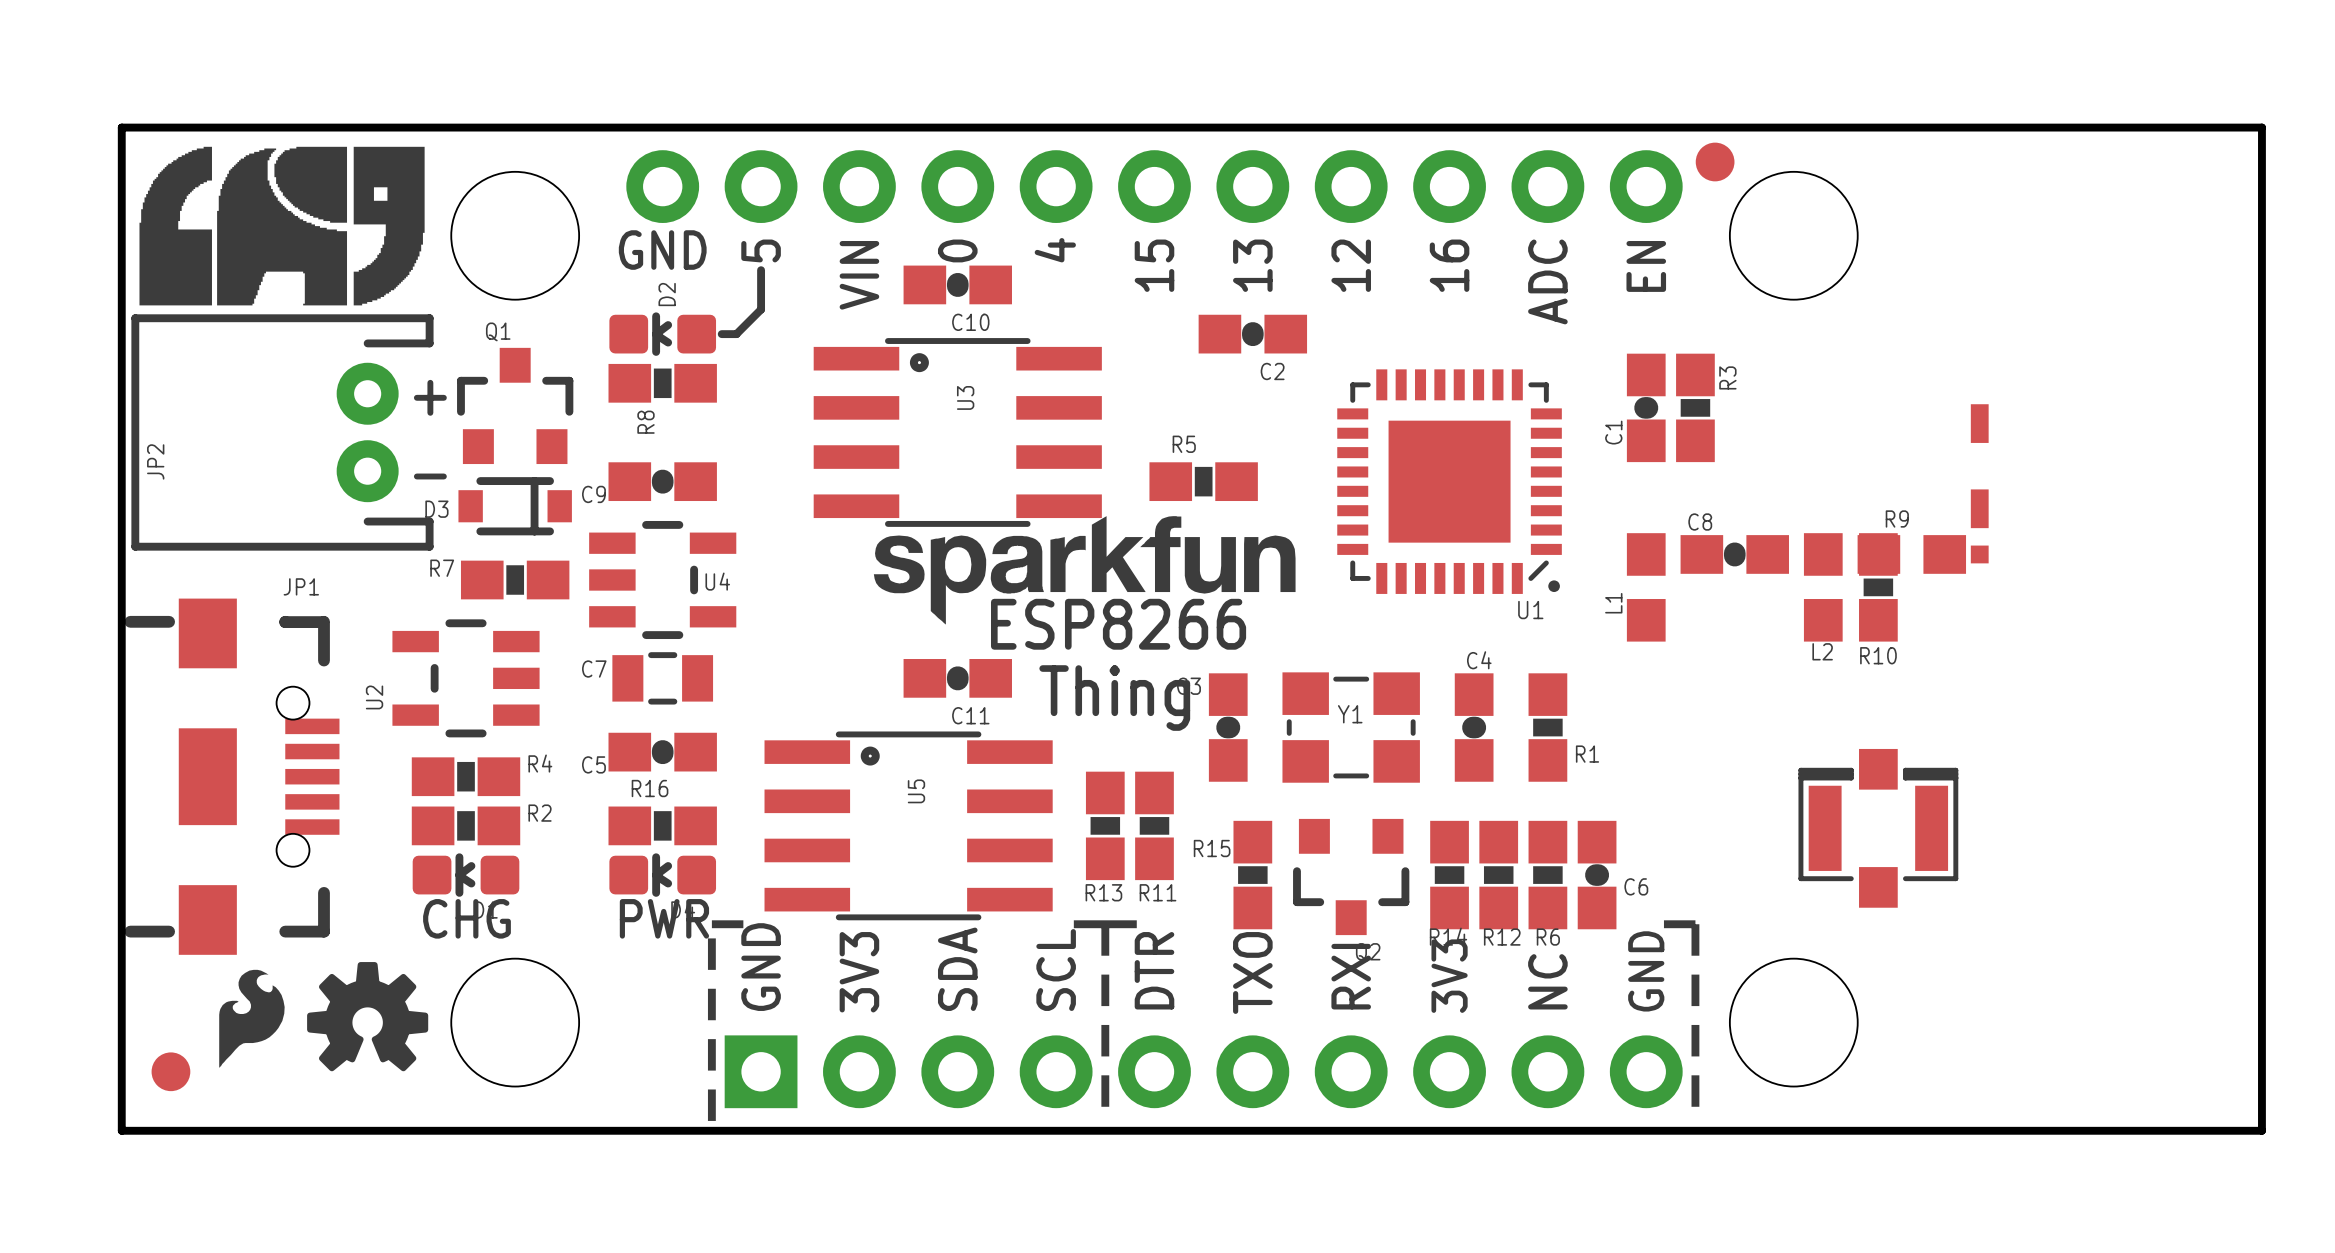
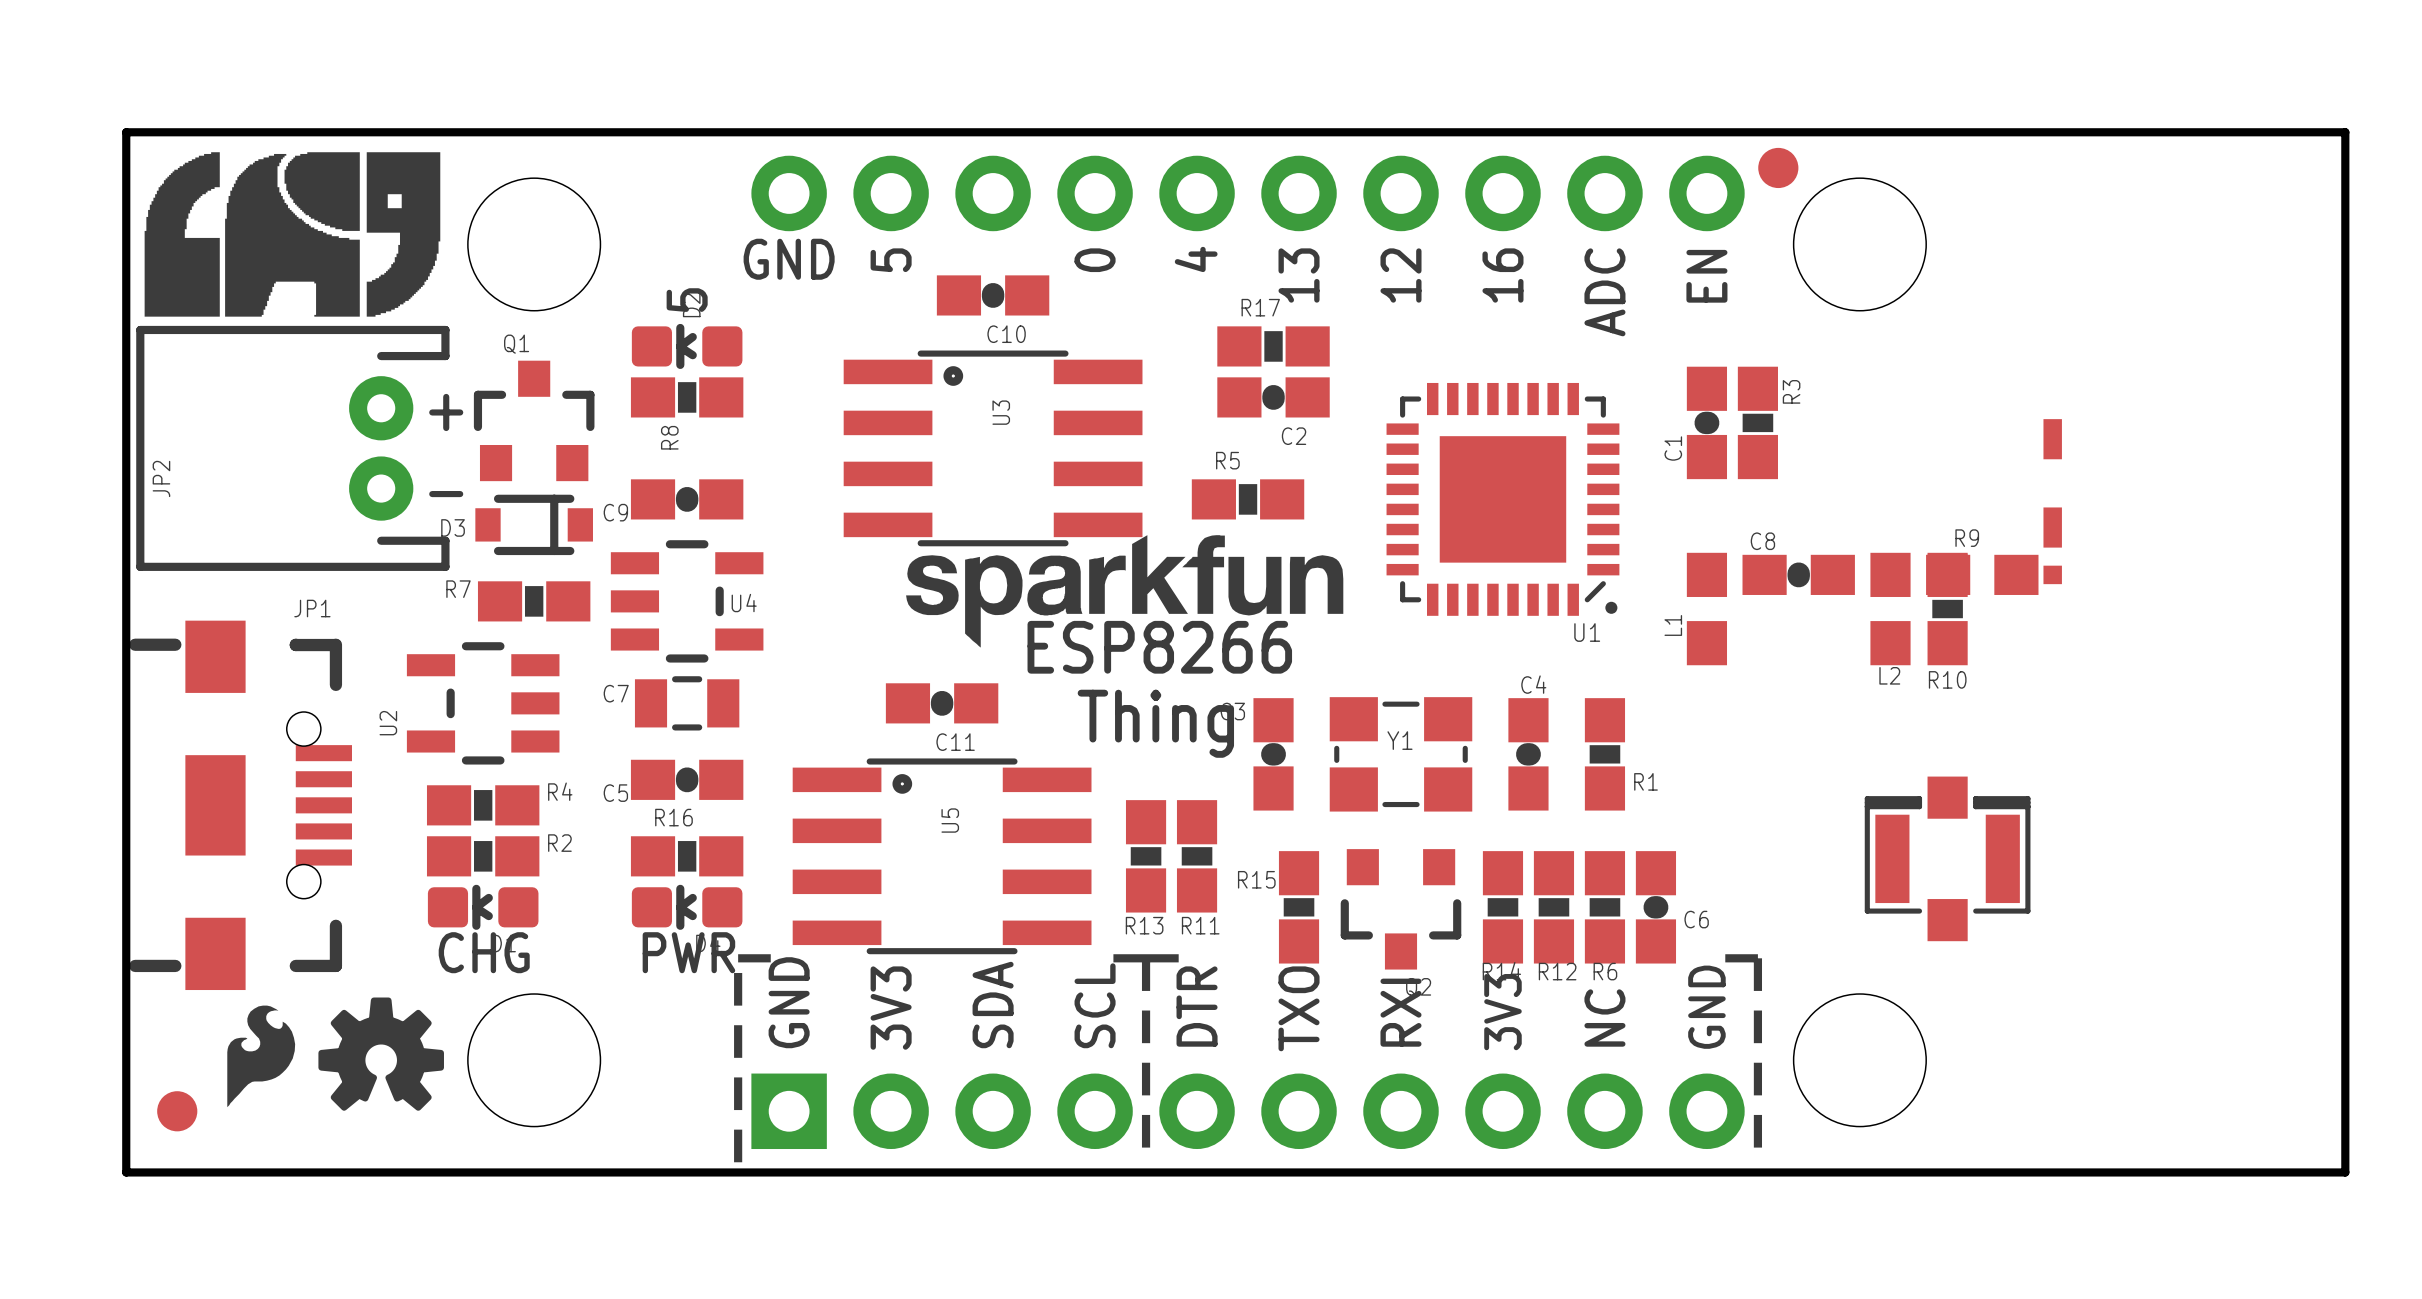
part: (1154, 186) -> none
text: GND (662, 250) -> none
text: 5 (761, 250) -> GND (789, 259)
text: 0 (957, 250) -> none
text: 4 (1055, 250) -> 0 (1095, 260)
text: 15 (1154, 265) -> 4 (1196, 259)
line: (761, 270) (761, 309) (736, 334) (721, 334) -> none
text: VIN (859, 275) -> 5 (891, 260)
text: none -> 5 (687, 300)
R17: none -> (1273, 346)
C2 position: (1252, 334) -> (1273, 397)
C11 position: (957, 678) -> (942, 703)

